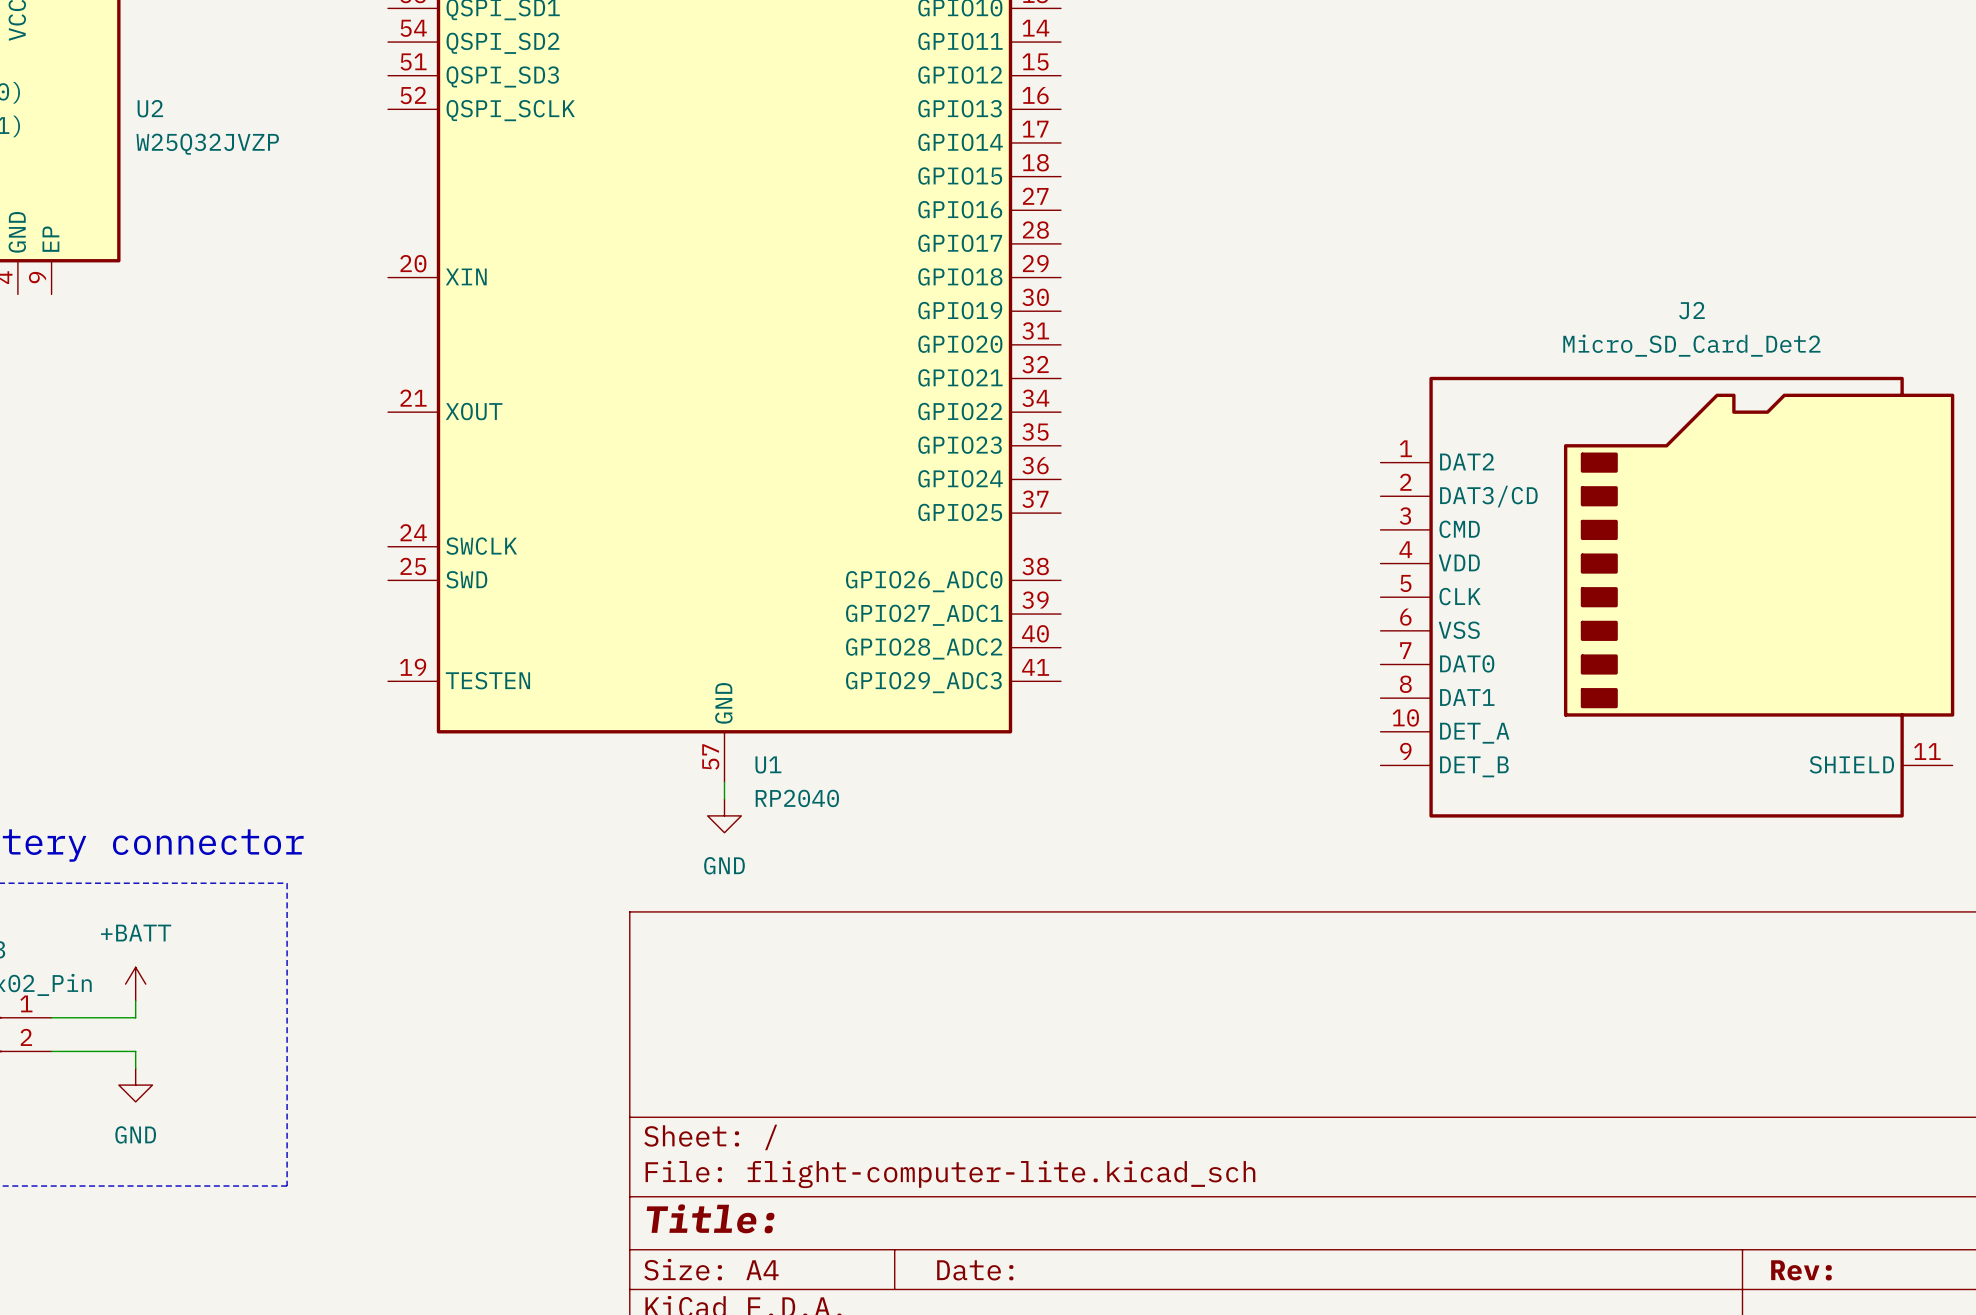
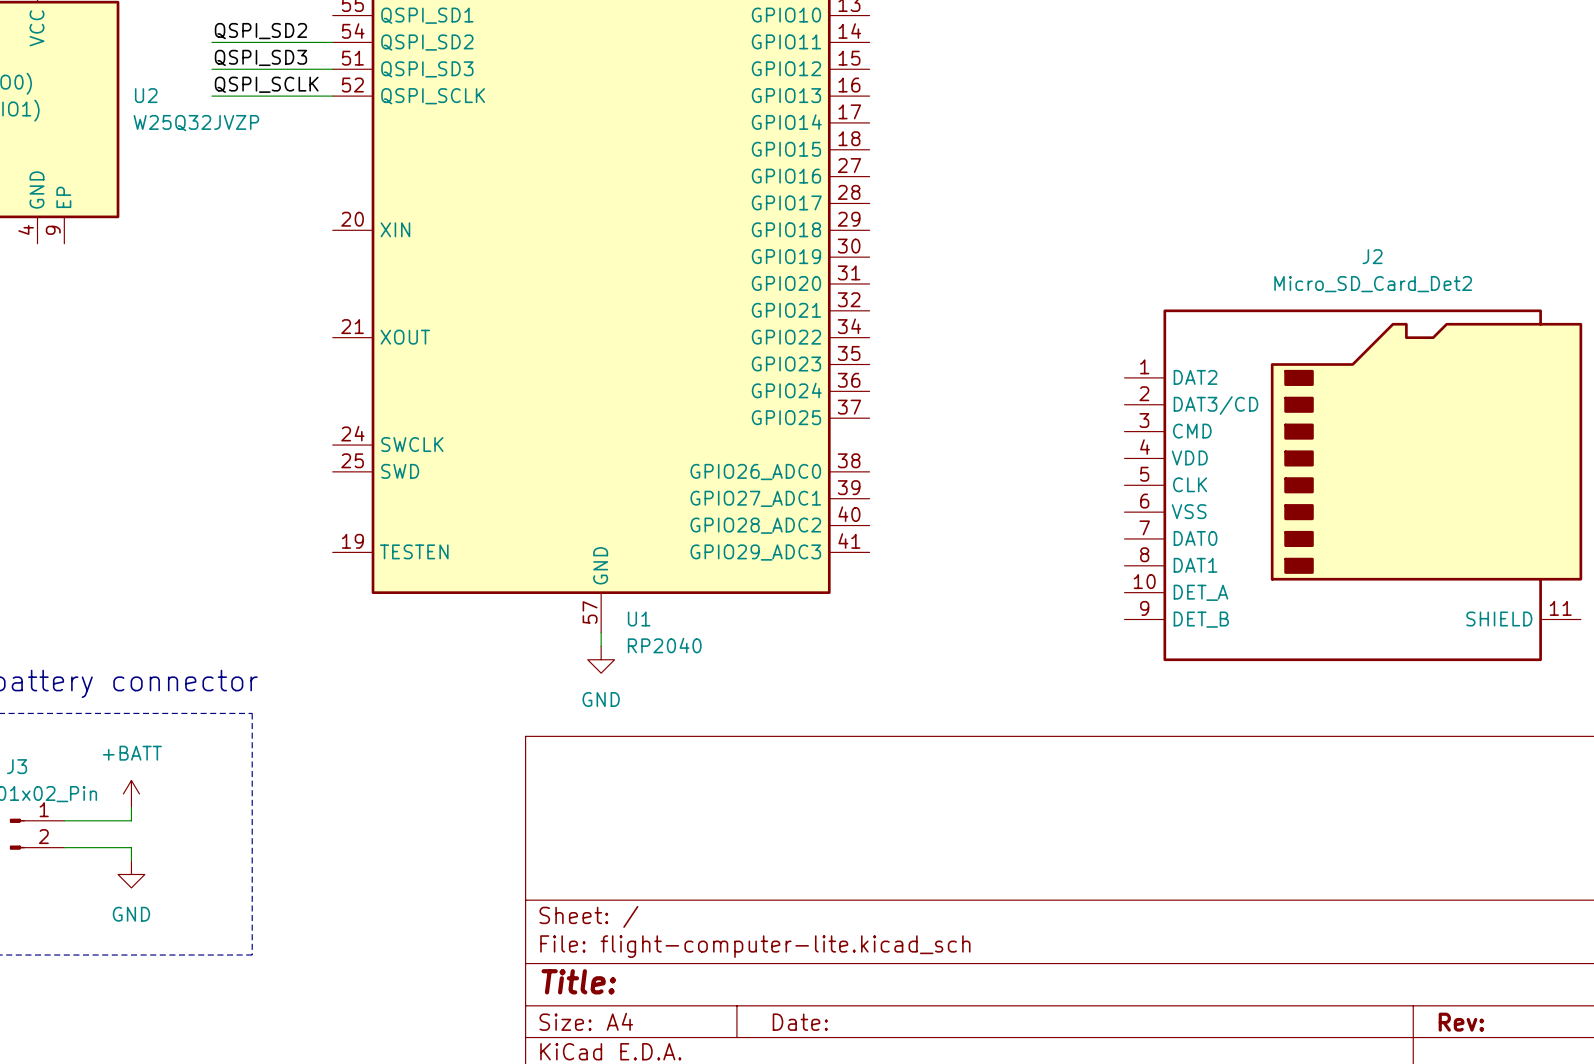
label: none -> QSPI_SD2 (260, 31)
wire: none -> (211, 42) (332, 42)
label: none -> QSPI_SD3 (260, 57)
wire: none -> (211, 69) (332, 69)
label: none -> QSPI_SCLK (266, 84)
wire: none -> (211, 96) (332, 96)

